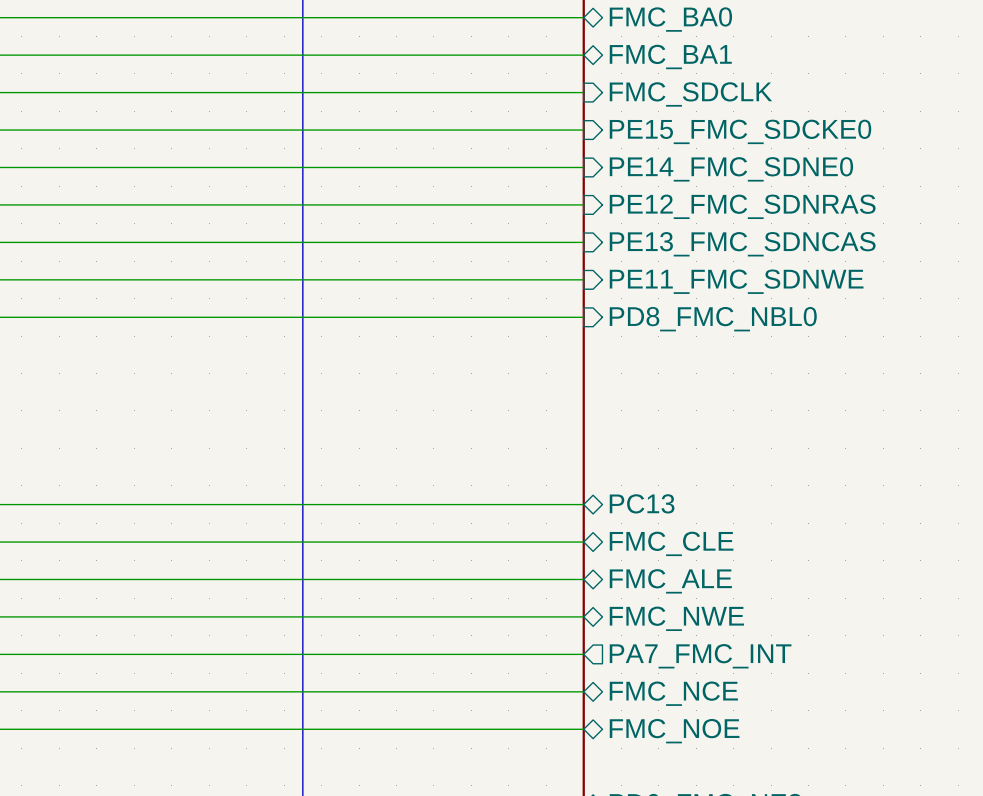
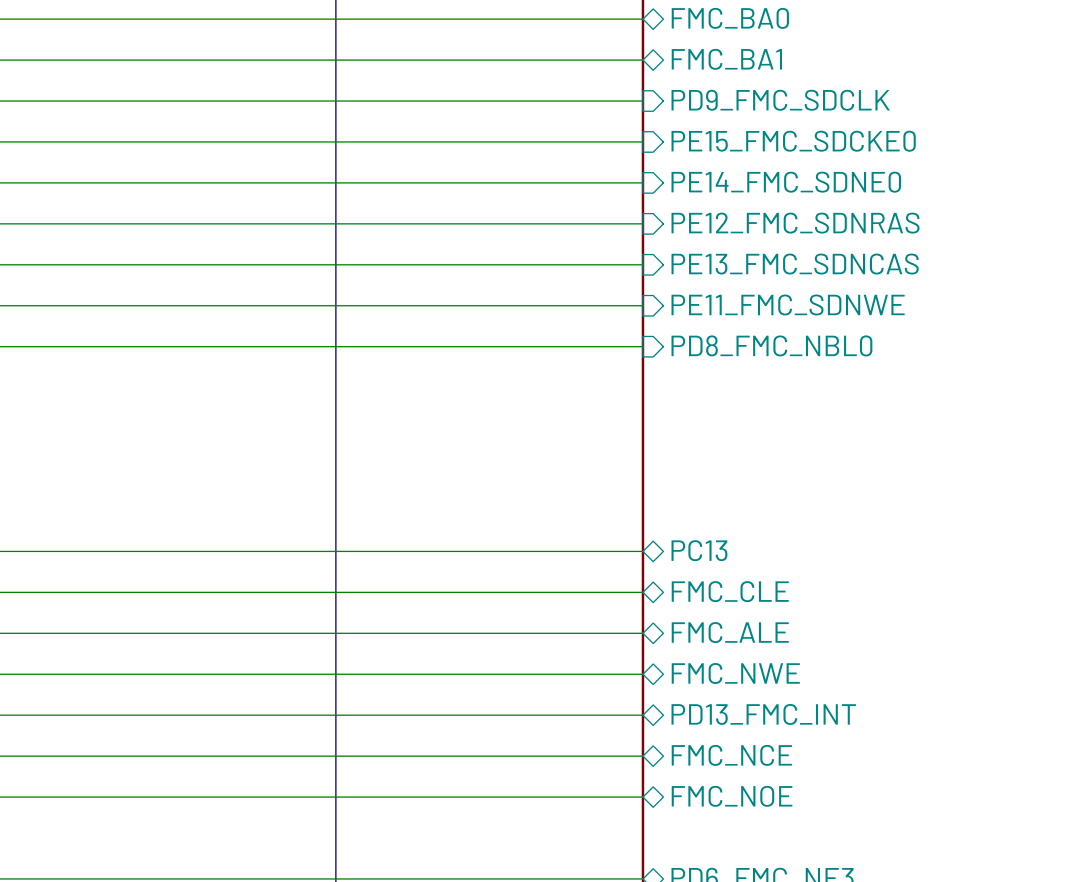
sheet pin: FMC_SDCLK (690, 94) -> PD9_FMC_SDCLK (780, 100)
sheet pin shape: output (700, 656) -> bidirectional (763, 714)
sheet pin: PA7_FMC_INT (700, 656) -> PD13_FMC_INT (763, 714)

